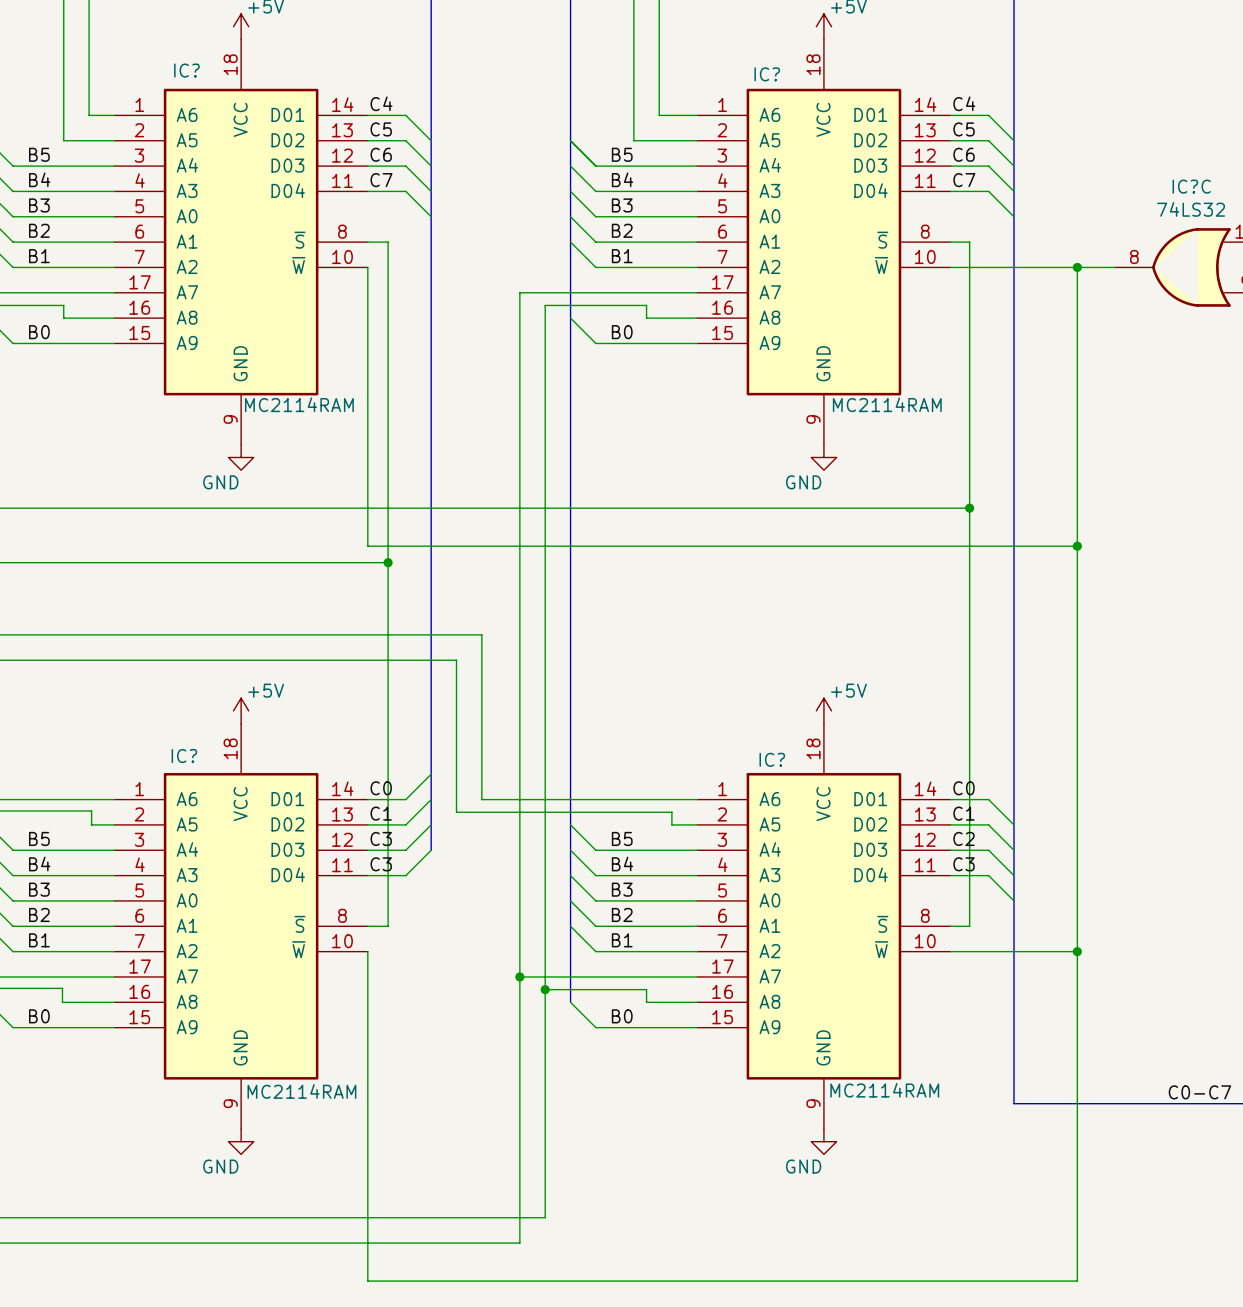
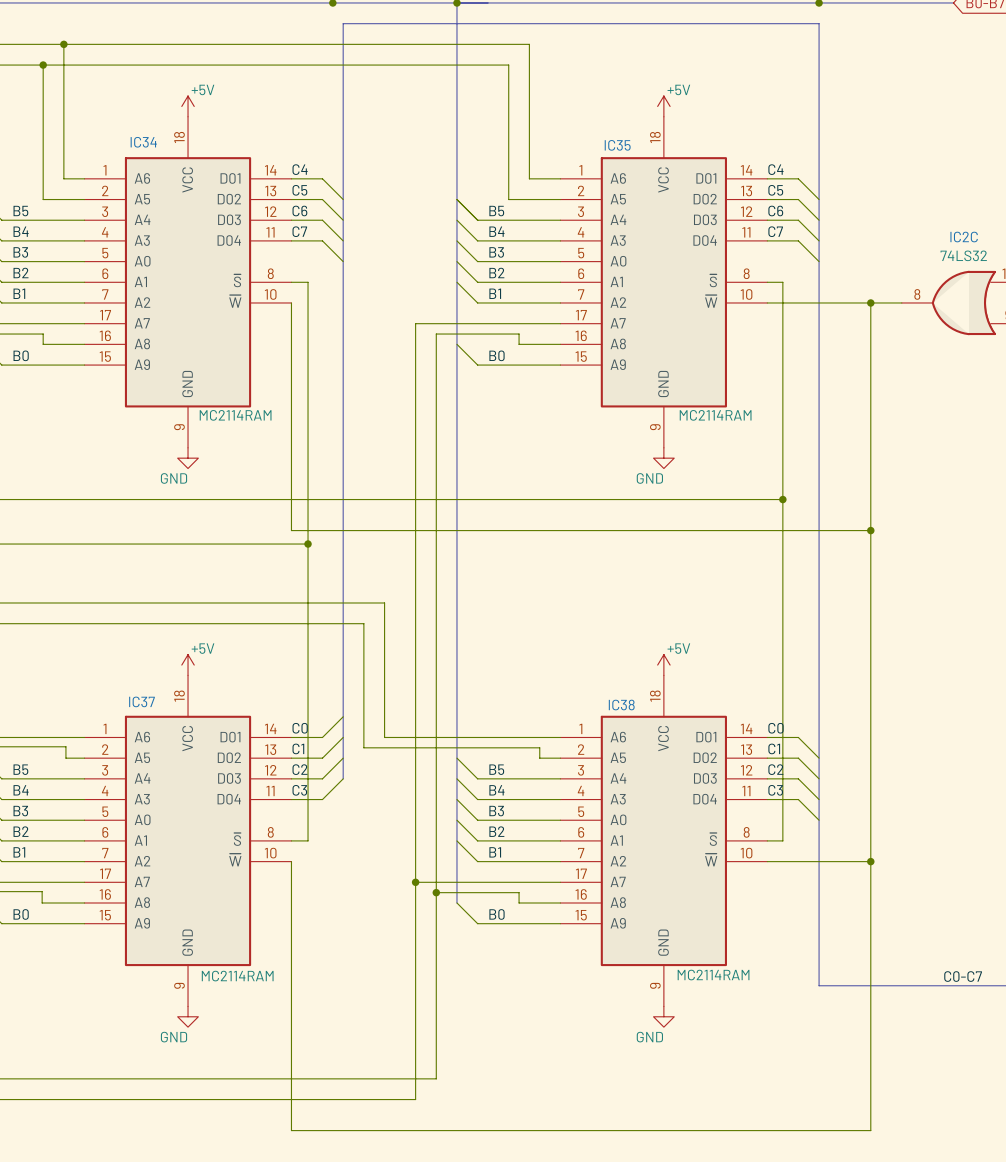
IC? name: IC? (186, 70) -> IC34 (143, 142)
IC? name: IC? (767, 74) -> IC35 (617, 145)
IC?C name: IC?C (1191, 186) -> IC2C (964, 237)
IC? name: IC? (184, 756) -> IC37 (141, 701)
IC? name: IC? (772, 759) -> IC38 (621, 705)
label: C3 (381, 838) -> C2 (300, 769)

